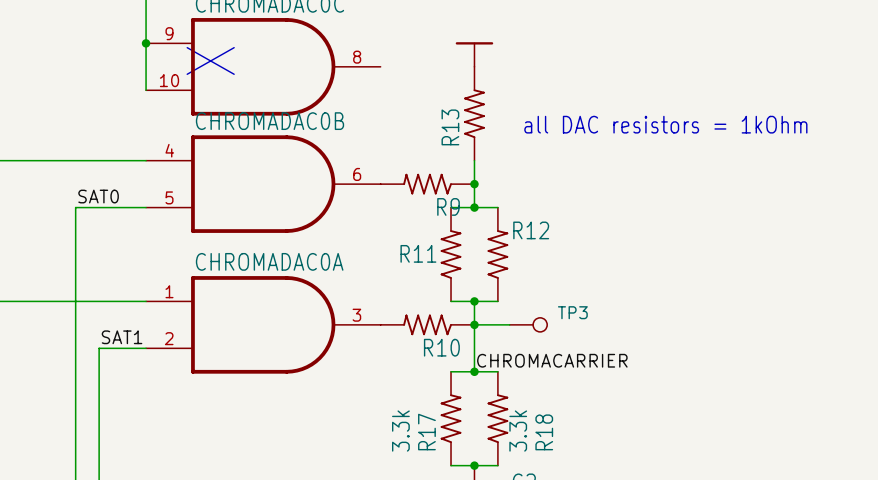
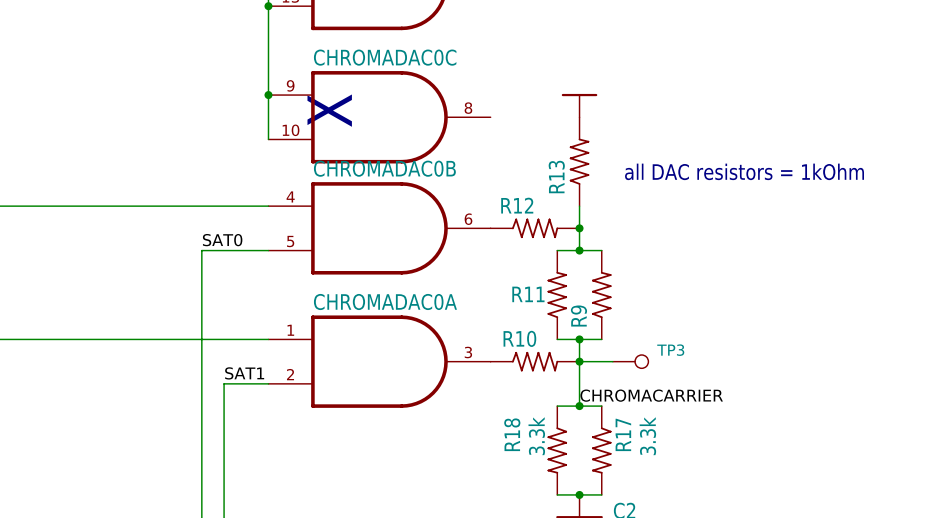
R9: (427, 184) -> none
R12: none -> (535, 228)
R12 name: R12 (531, 230) -> R9 (578, 316)
R10 rotation: 0° (427, 324) -> 180° (535, 361)
R17 rotation: 0° (451, 418) -> 180° (601, 450)
R18 rotation: 0° (497, 418) -> 180° (557, 450)

